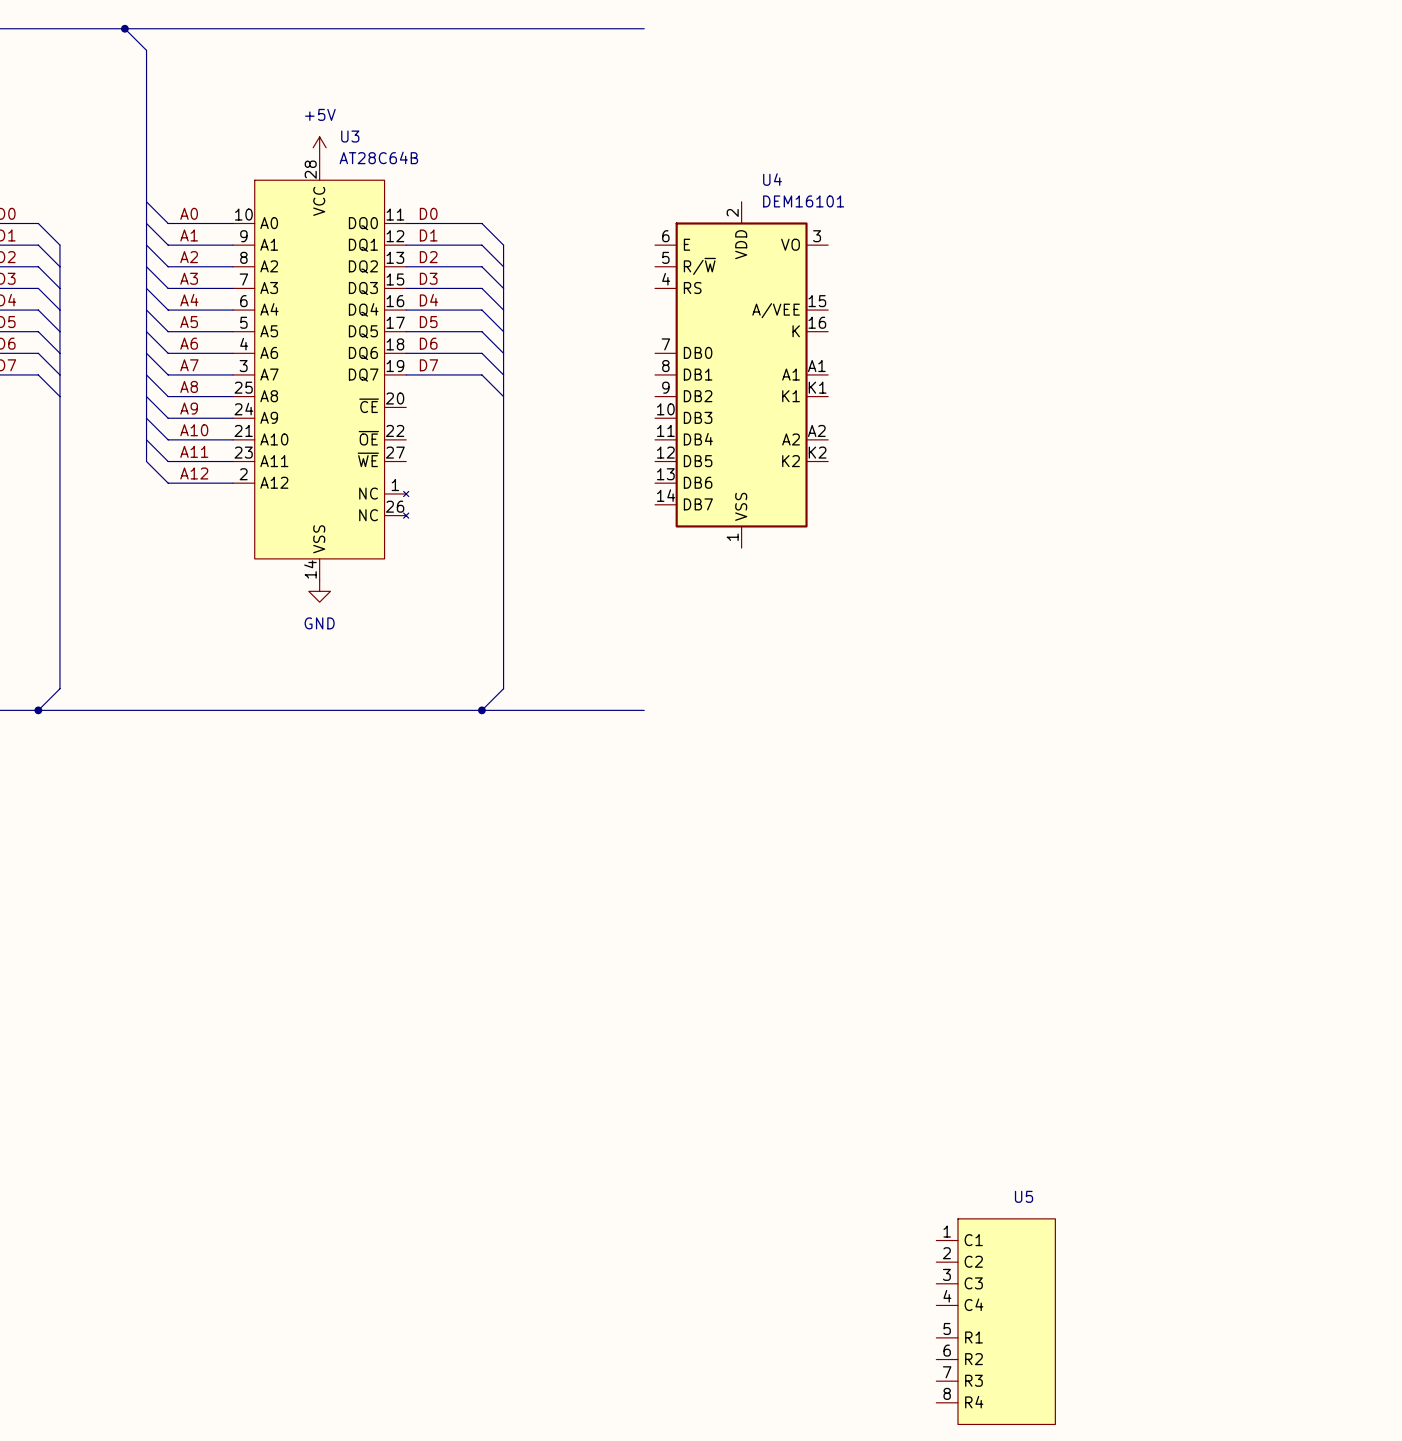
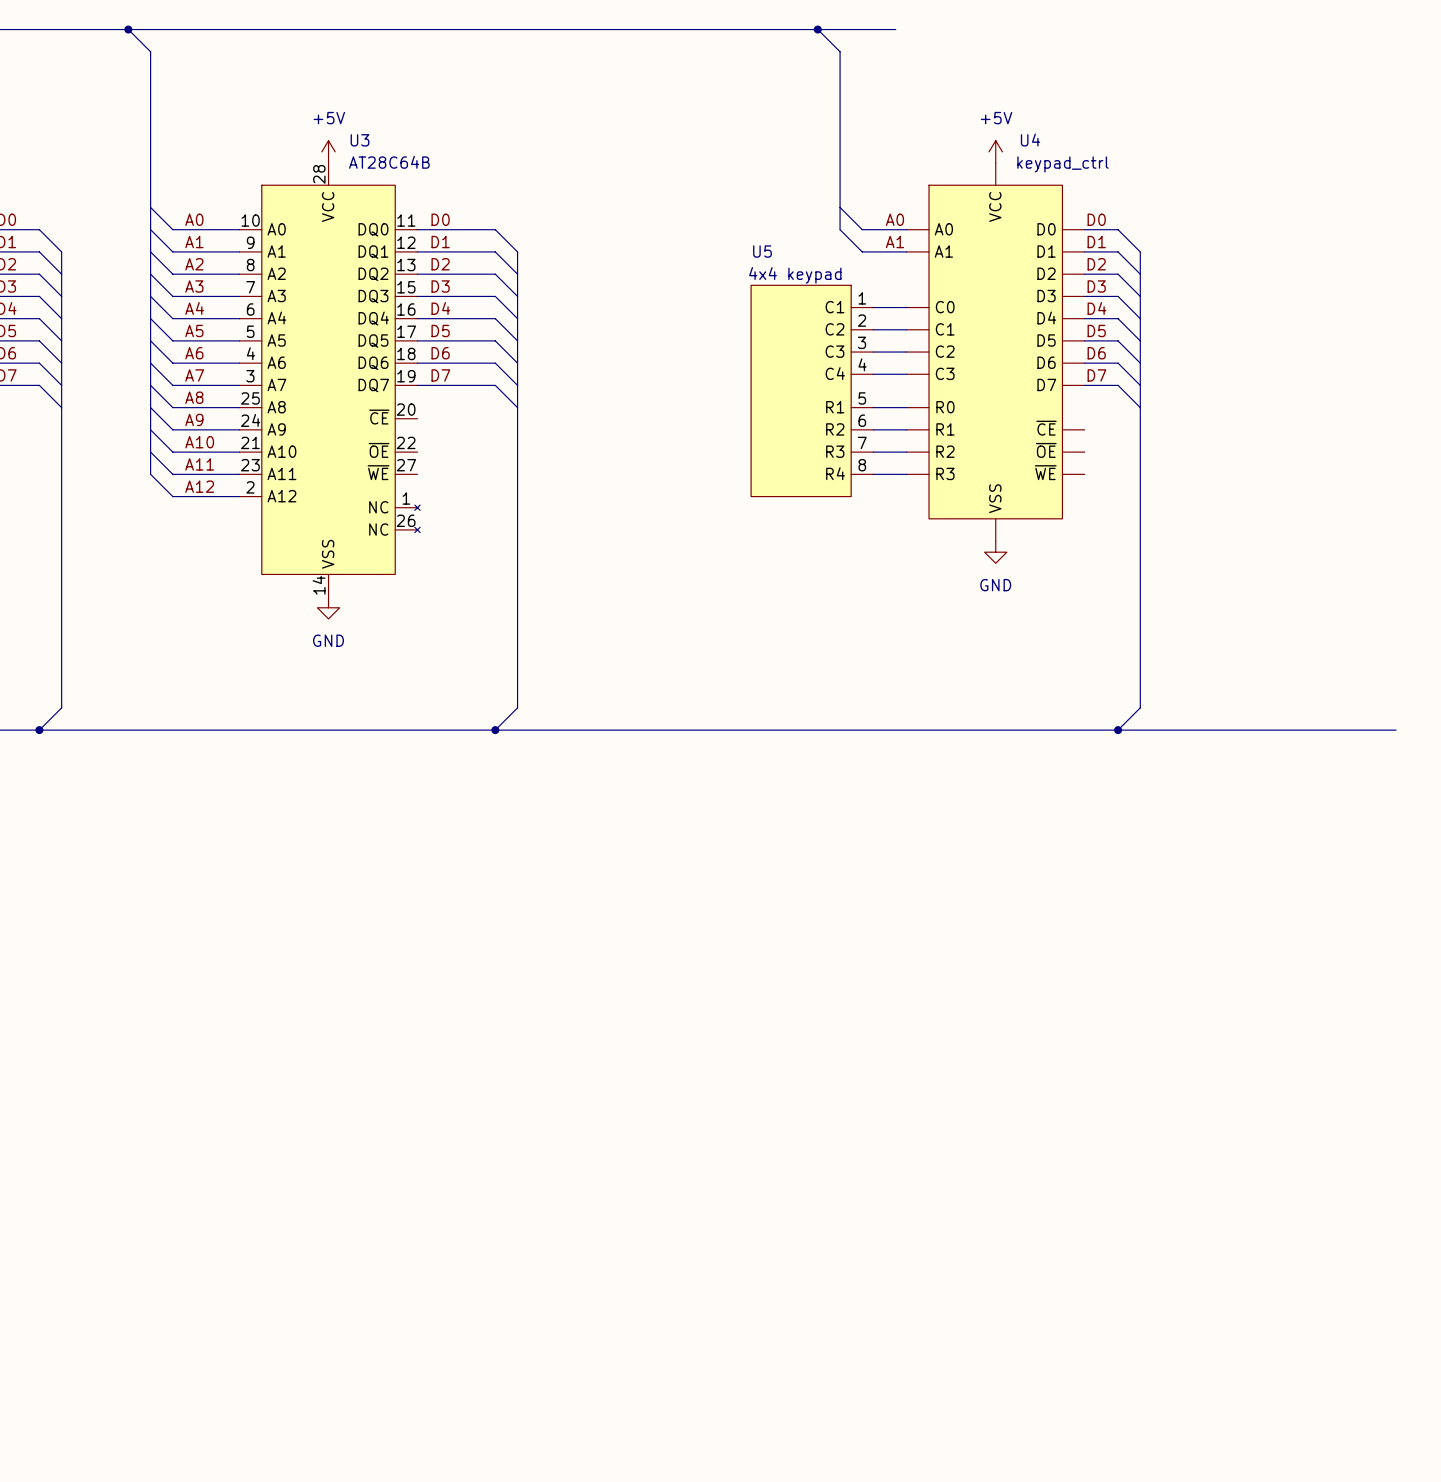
bus: none -> (662, 29) (895, 29)
bus: none -> (817, 29) (840, 51) (840, 229)
junction: none -> (817, 29)
power symbol: none -> +5V (995, 151)
U4 symbol: [655, 201, 829, 549] -> [906, 162, 1085, 542]
U4 value: DEM16101 (803, 201) -> keypad_ctrl (1062, 164)
wire: none -> (840, 207) (862, 229) (906, 229)
label: none -> A0 (894, 219)
label: none -> D0 (1096, 219)
wire: none -> (840, 229) (862, 251) (906, 251)
wire: none -> (1084, 229) (1118, 229) (1140, 251)
label: none -> A1 (894, 242)
label: none -> D1 (1096, 242)
wire: none -> (1084, 251) (1118, 251) (1140, 274)
bus: none -> (1140, 251) (1140, 707) (1118, 730)
label: none -> D2 (1096, 264)
wire: none -> (1084, 274) (1118, 274) (1140, 296)
U5 value: none -> 4x4 keypad (795, 275)
label: none -> D3 (1096, 286)
wire: none -> (1084, 296) (1118, 296) (1140, 318)
wire: none -> (873, 307) (906, 307)
label: none -> D4 (1096, 308)
wire: none -> (1084, 318) (1118, 318) (1140, 340)
wire: none -> (873, 329) (906, 329)
label: none -> D5 (1096, 330)
wire: none -> (1084, 340) (1118, 340) (1140, 363)
wire: none -> (873, 352) (906, 352)
label: none -> D6 (1096, 353)
wire: none -> (1084, 363) (1118, 363) (1140, 385)
wire: none -> (873, 374) (906, 374)
label: none -> D7 (1096, 375)
wire: none -> (1084, 385) (1118, 385) (1140, 407)
wire: none -> (873, 407) (906, 407)
wire: none -> (873, 429) (906, 429)
wire: none -> (873, 452) (906, 452)
wire: none -> (873, 474) (906, 474)
power symbol: none -> GND (995, 552)
bus: none -> (662, 730) (1396, 730)
junction: none -> (1118, 730)
U5 name position: U5 (1024, 1196) -> U5 (762, 251)
U5 position: (995, 1321) -> (812, 390)
U5 flip: as is (1006, 1321) -> left-right (801, 390)

